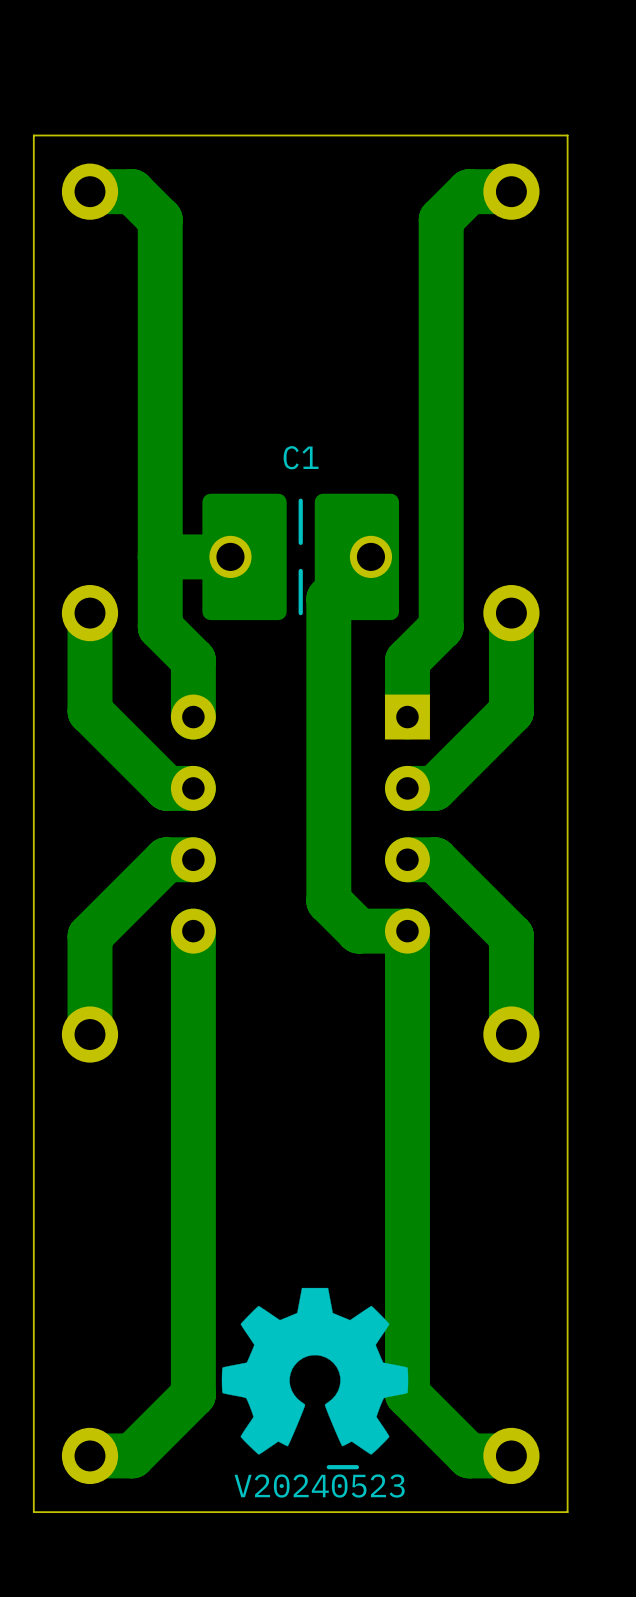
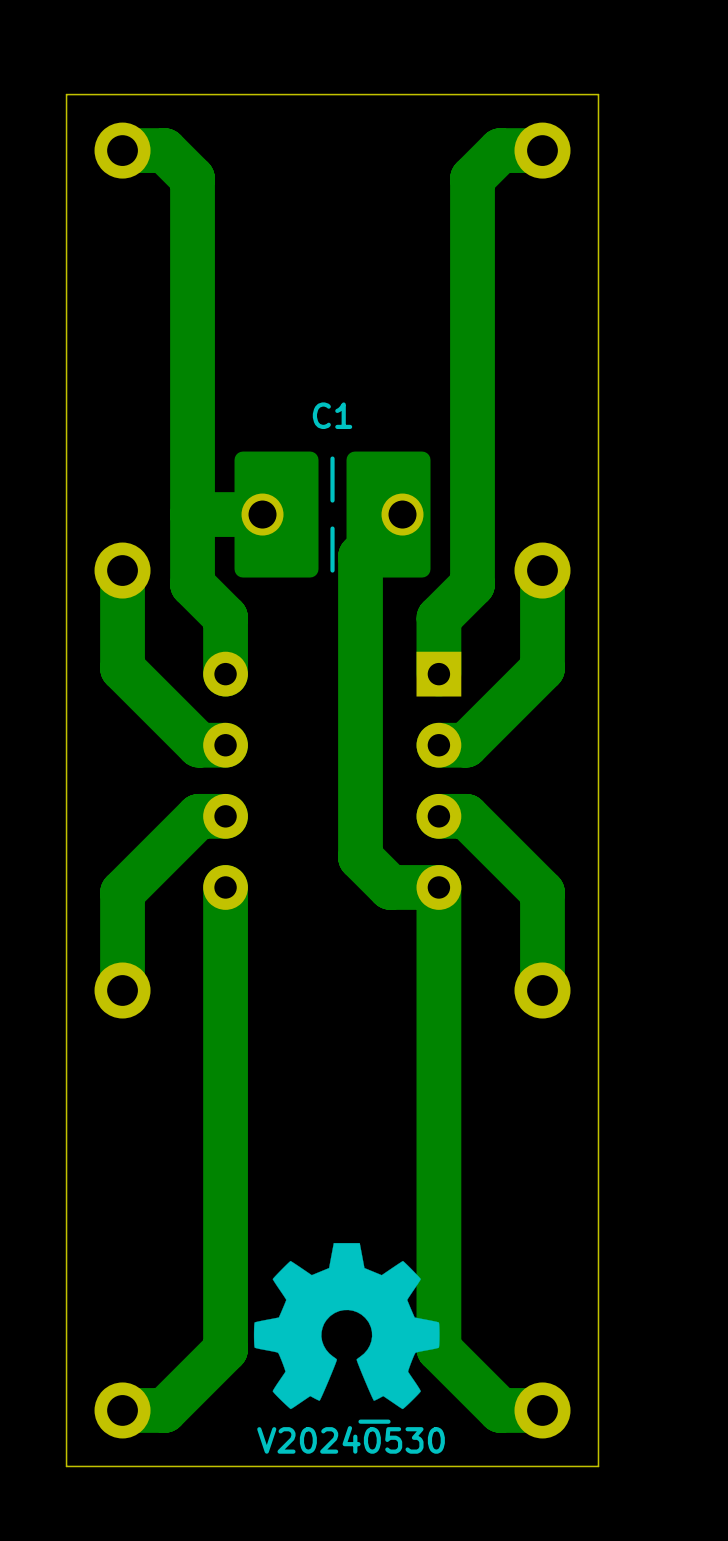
drawing shape: [234, 1465, 405, 1498] -> [257, 1419, 445, 1454]

